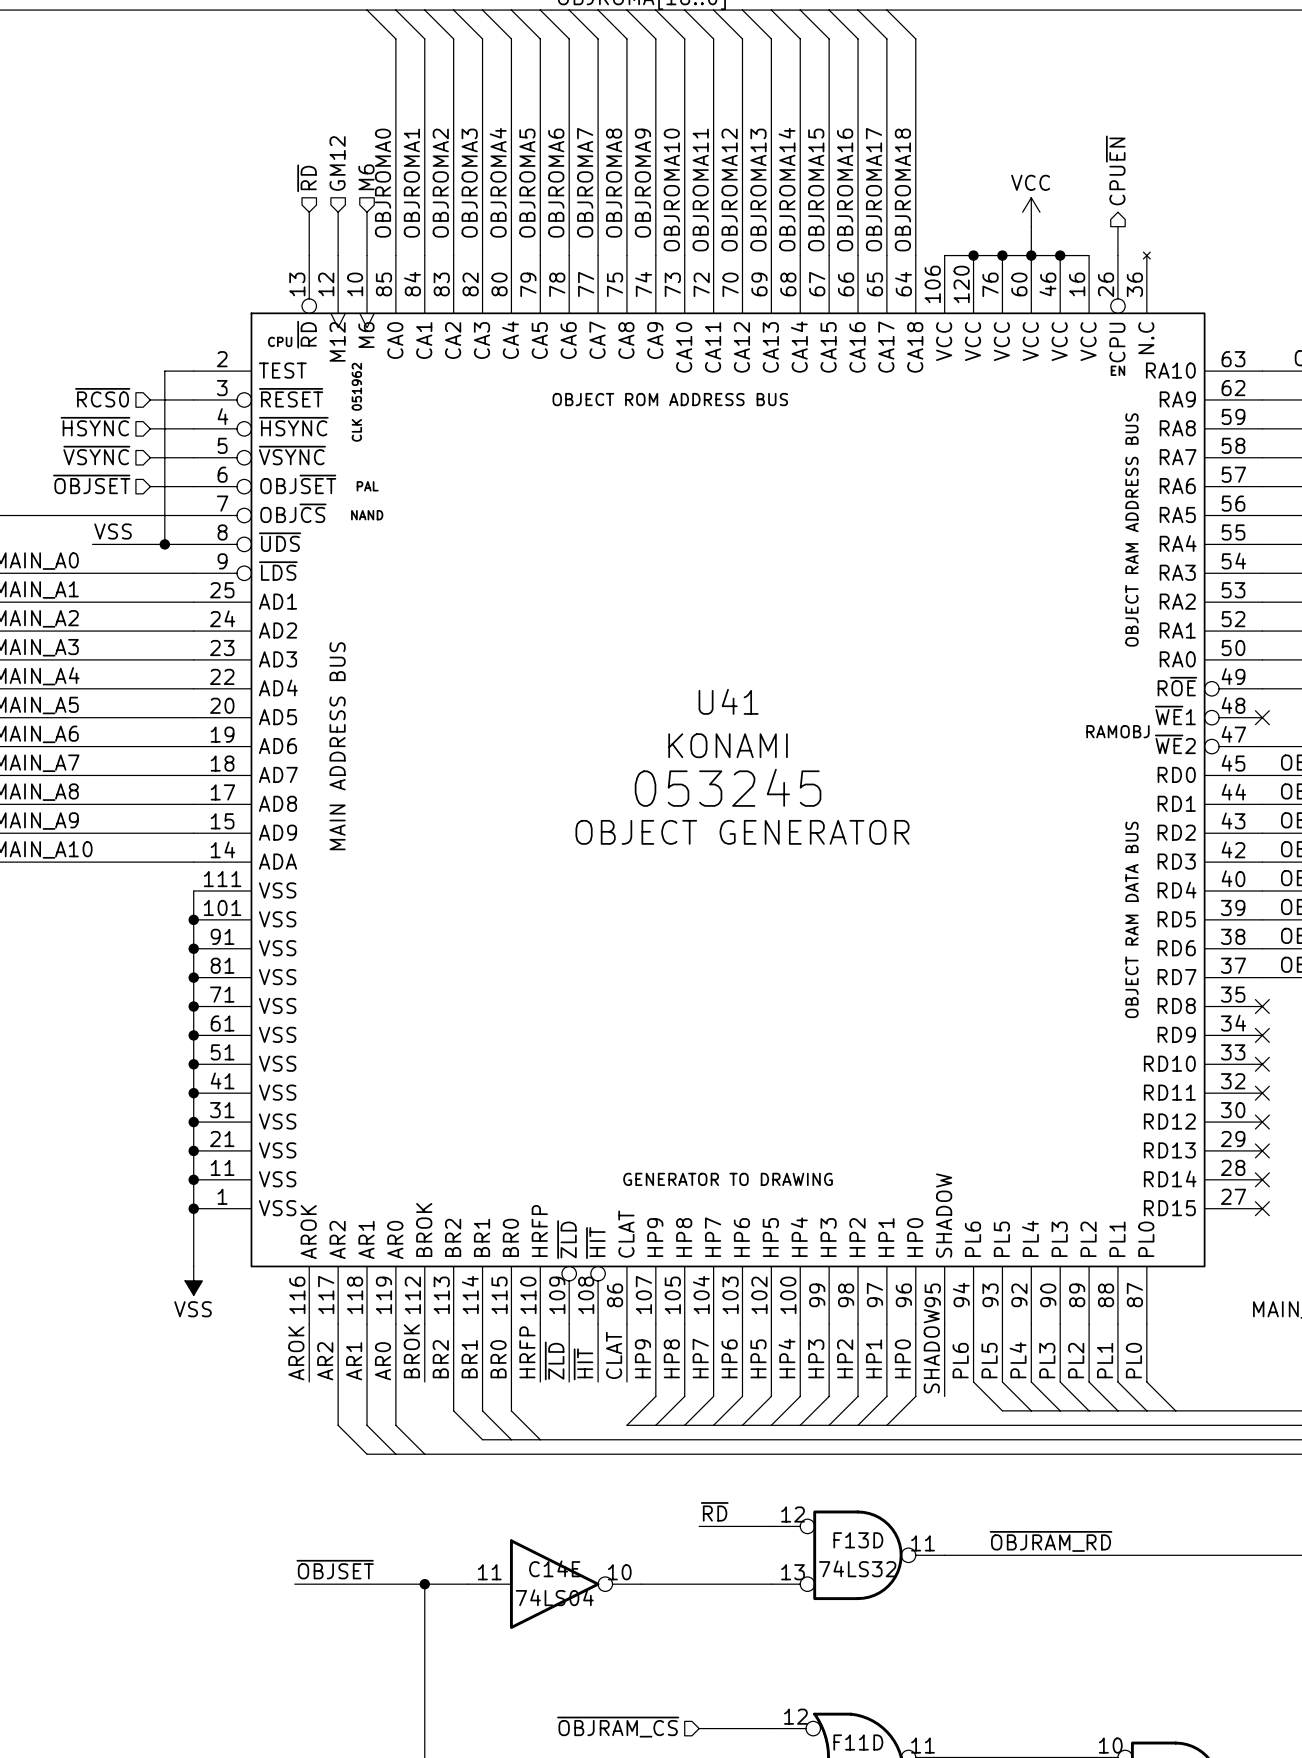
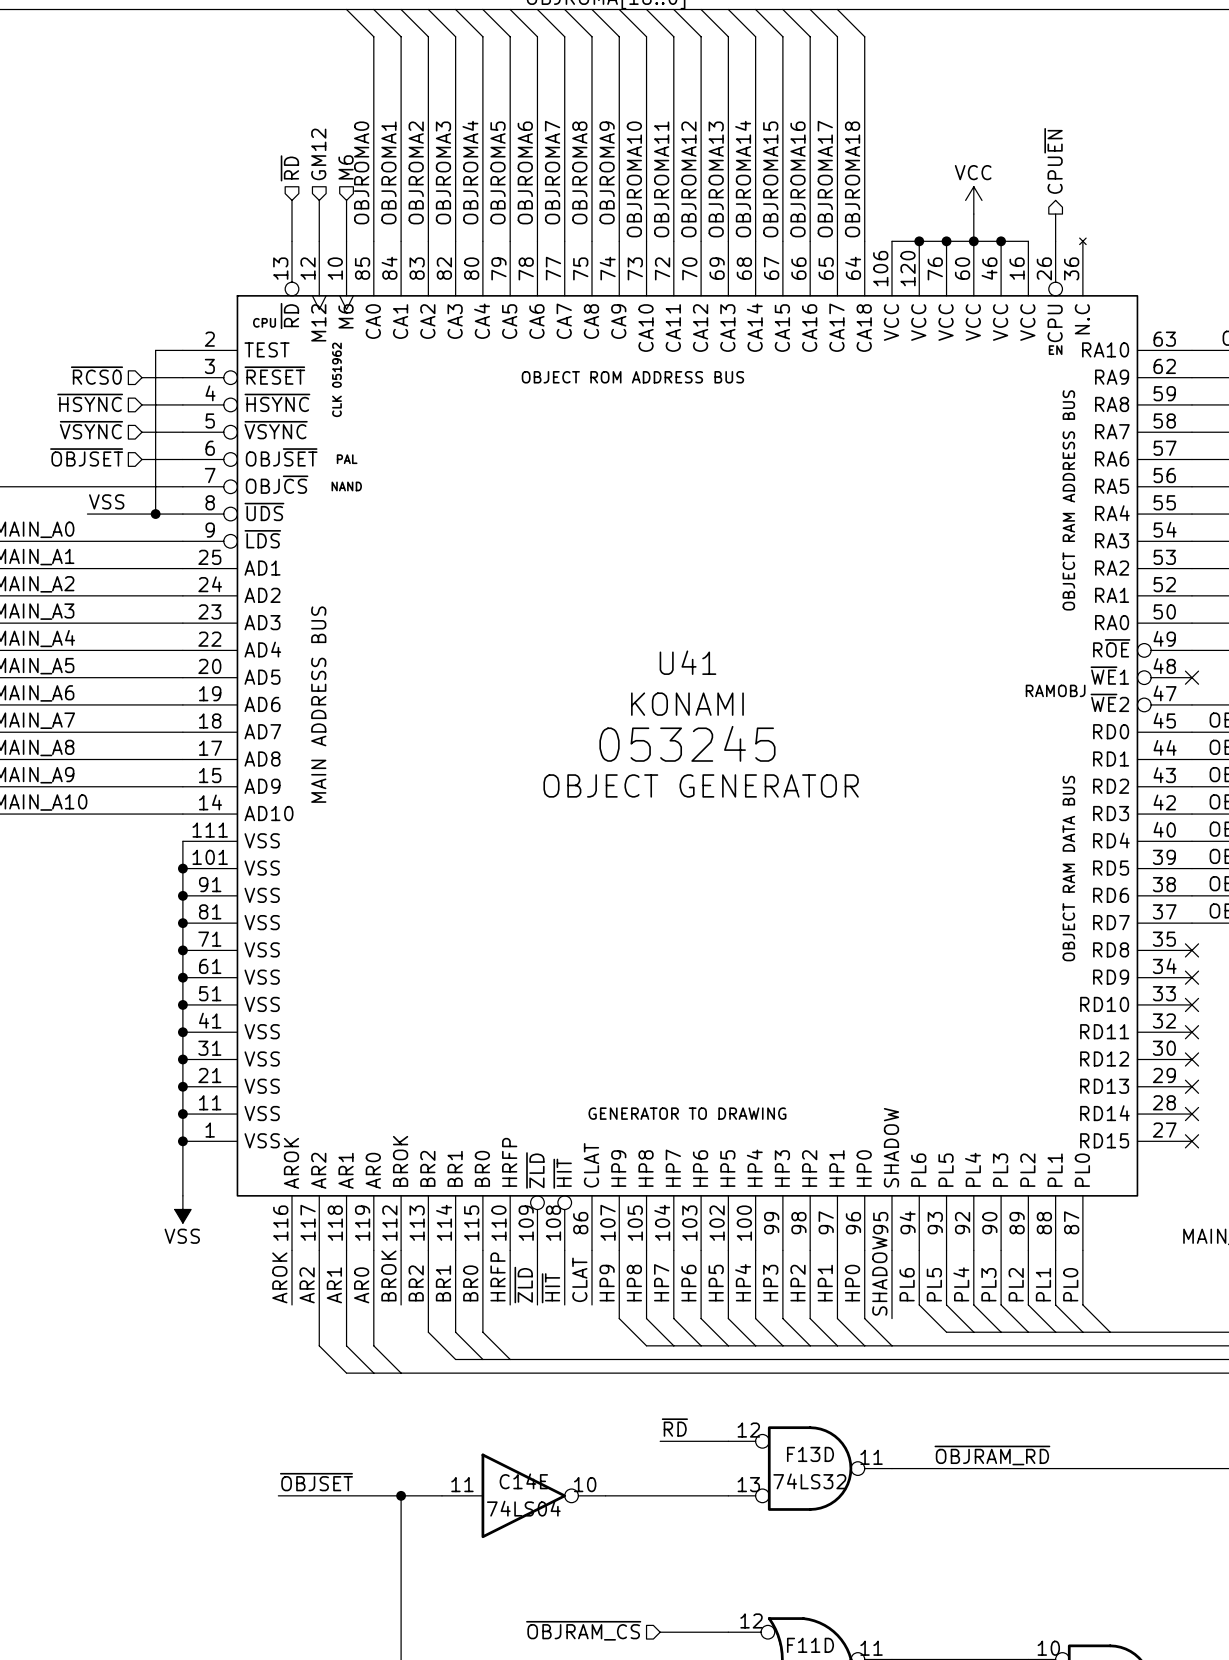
U41 pin name: ADA (277, 861) -> AD10 (268, 813)
wire: (655, 1396) (626, 1425) -> (619, 1318) (646, 1345)
wire: (684, 1396) (655, 1425) -> (646, 1318) (673, 1345)
wire: (713, 1396) (684, 1425) -> (673, 1318) (701, 1345)
wire: (742, 1396) (713, 1425) -> (701, 1318) (728, 1345)
wire: (771, 1396) (742, 1425) -> (728, 1318) (755, 1345)
wire: (800, 1396) (771, 1425) -> (755, 1318) (782, 1345)
wire: (829, 1396) (800, 1425) -> (782, 1318) (810, 1345)
wire: (858, 1396) (829, 1425) -> (810, 1318) (837, 1345)
wire: (886, 1396) (858, 1425) -> (837, 1318) (864, 1345)
wire: (915, 1396) (886, 1425) -> (864, 1318) (891, 1345)
bus: (626, 1425) (684, 1425) -> none

